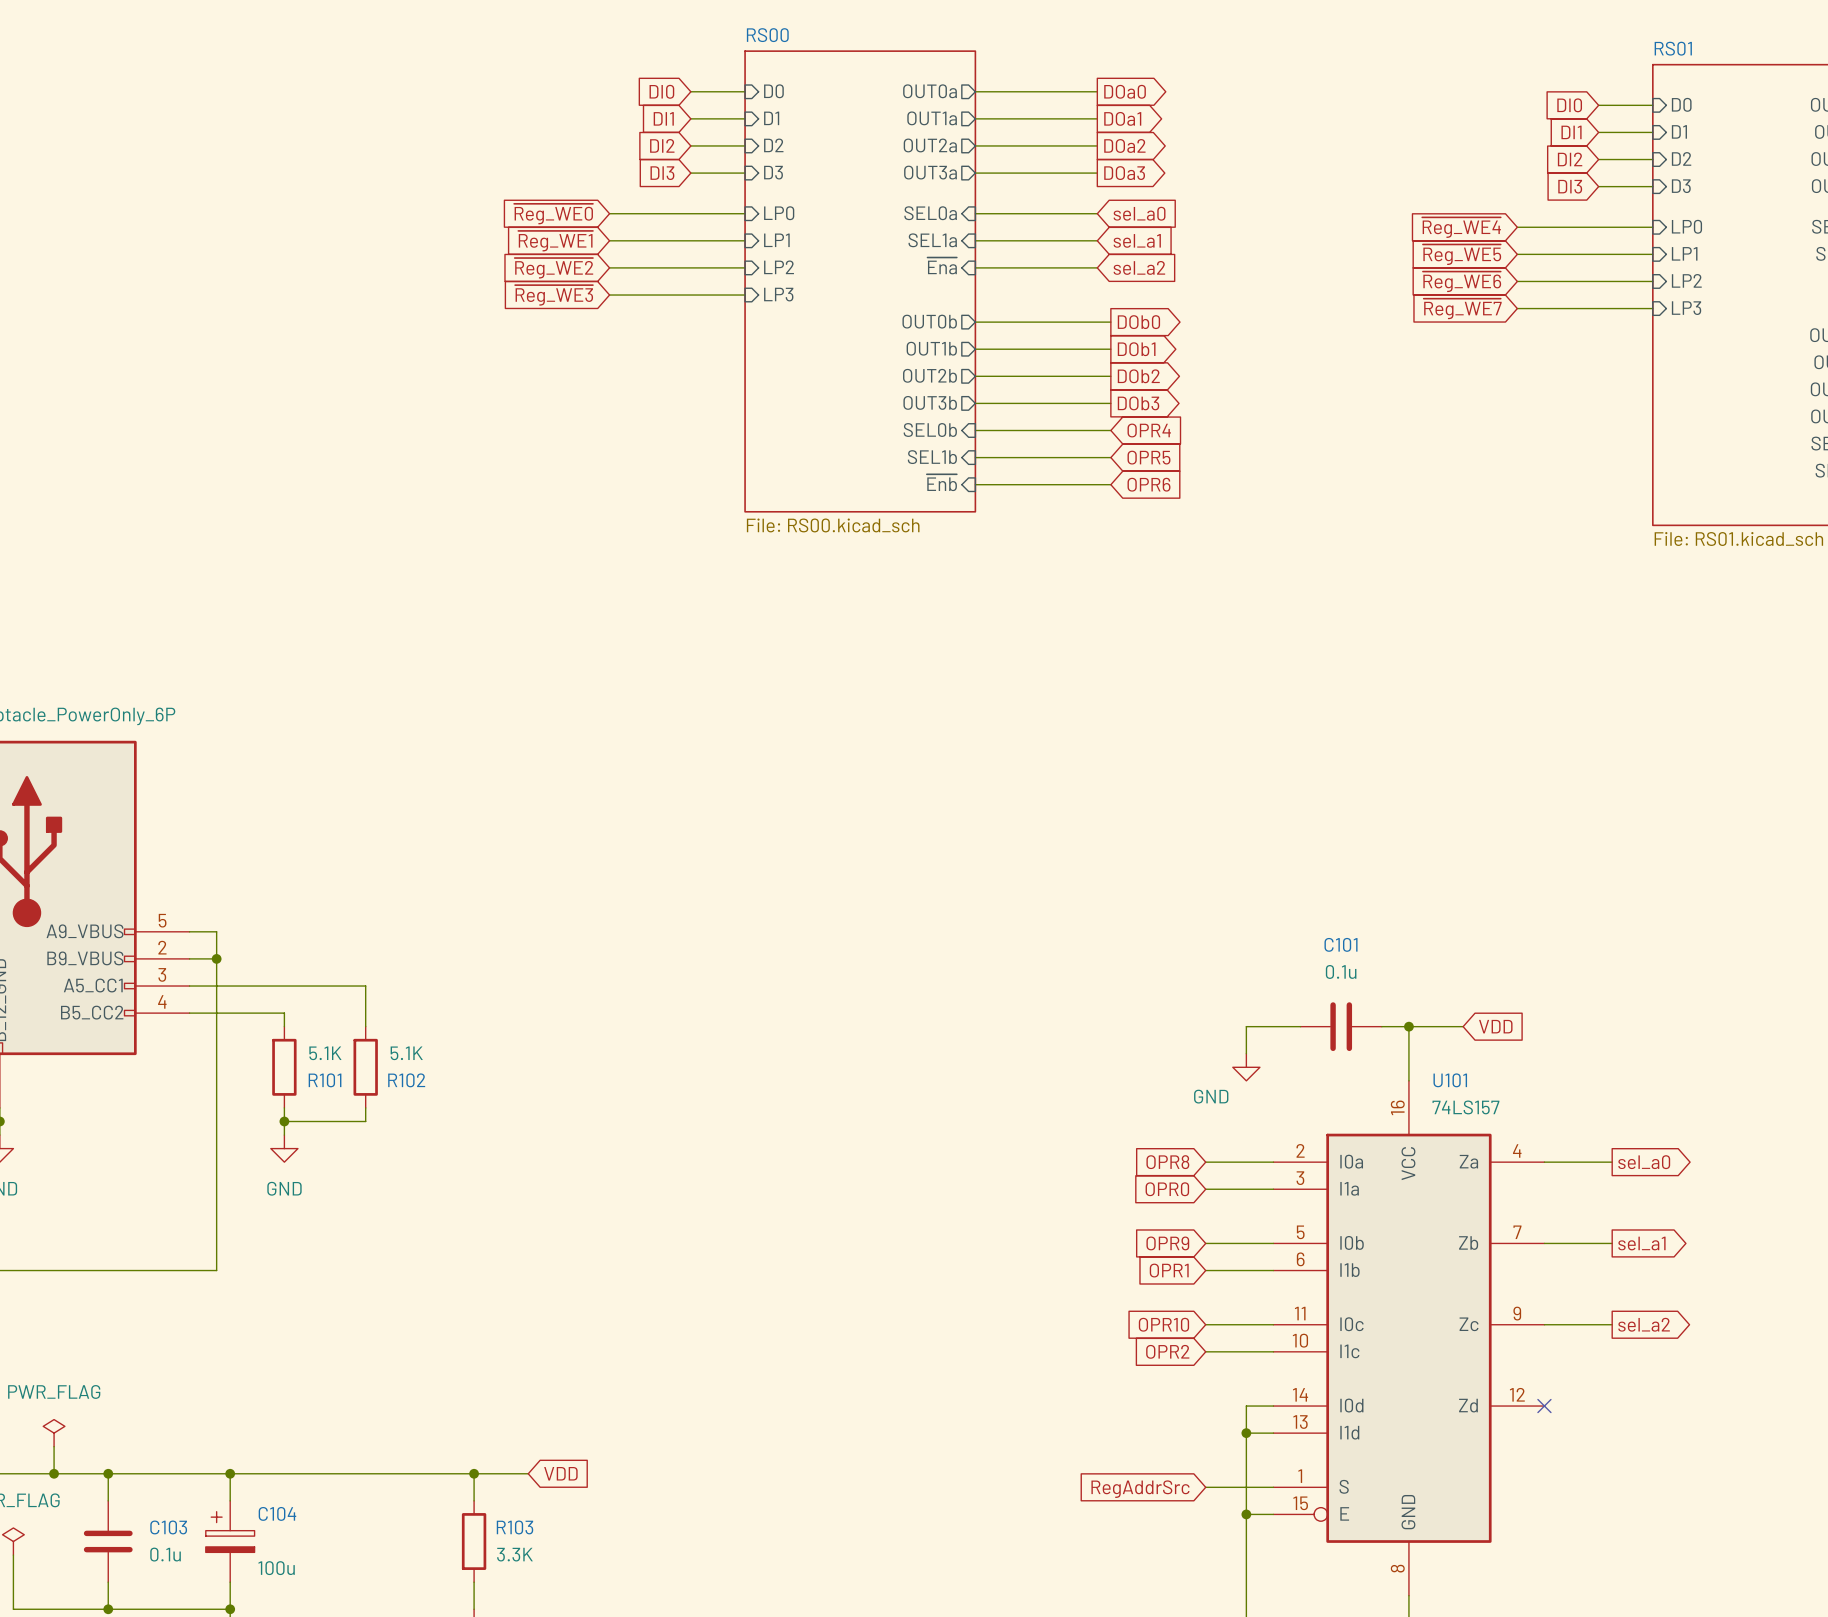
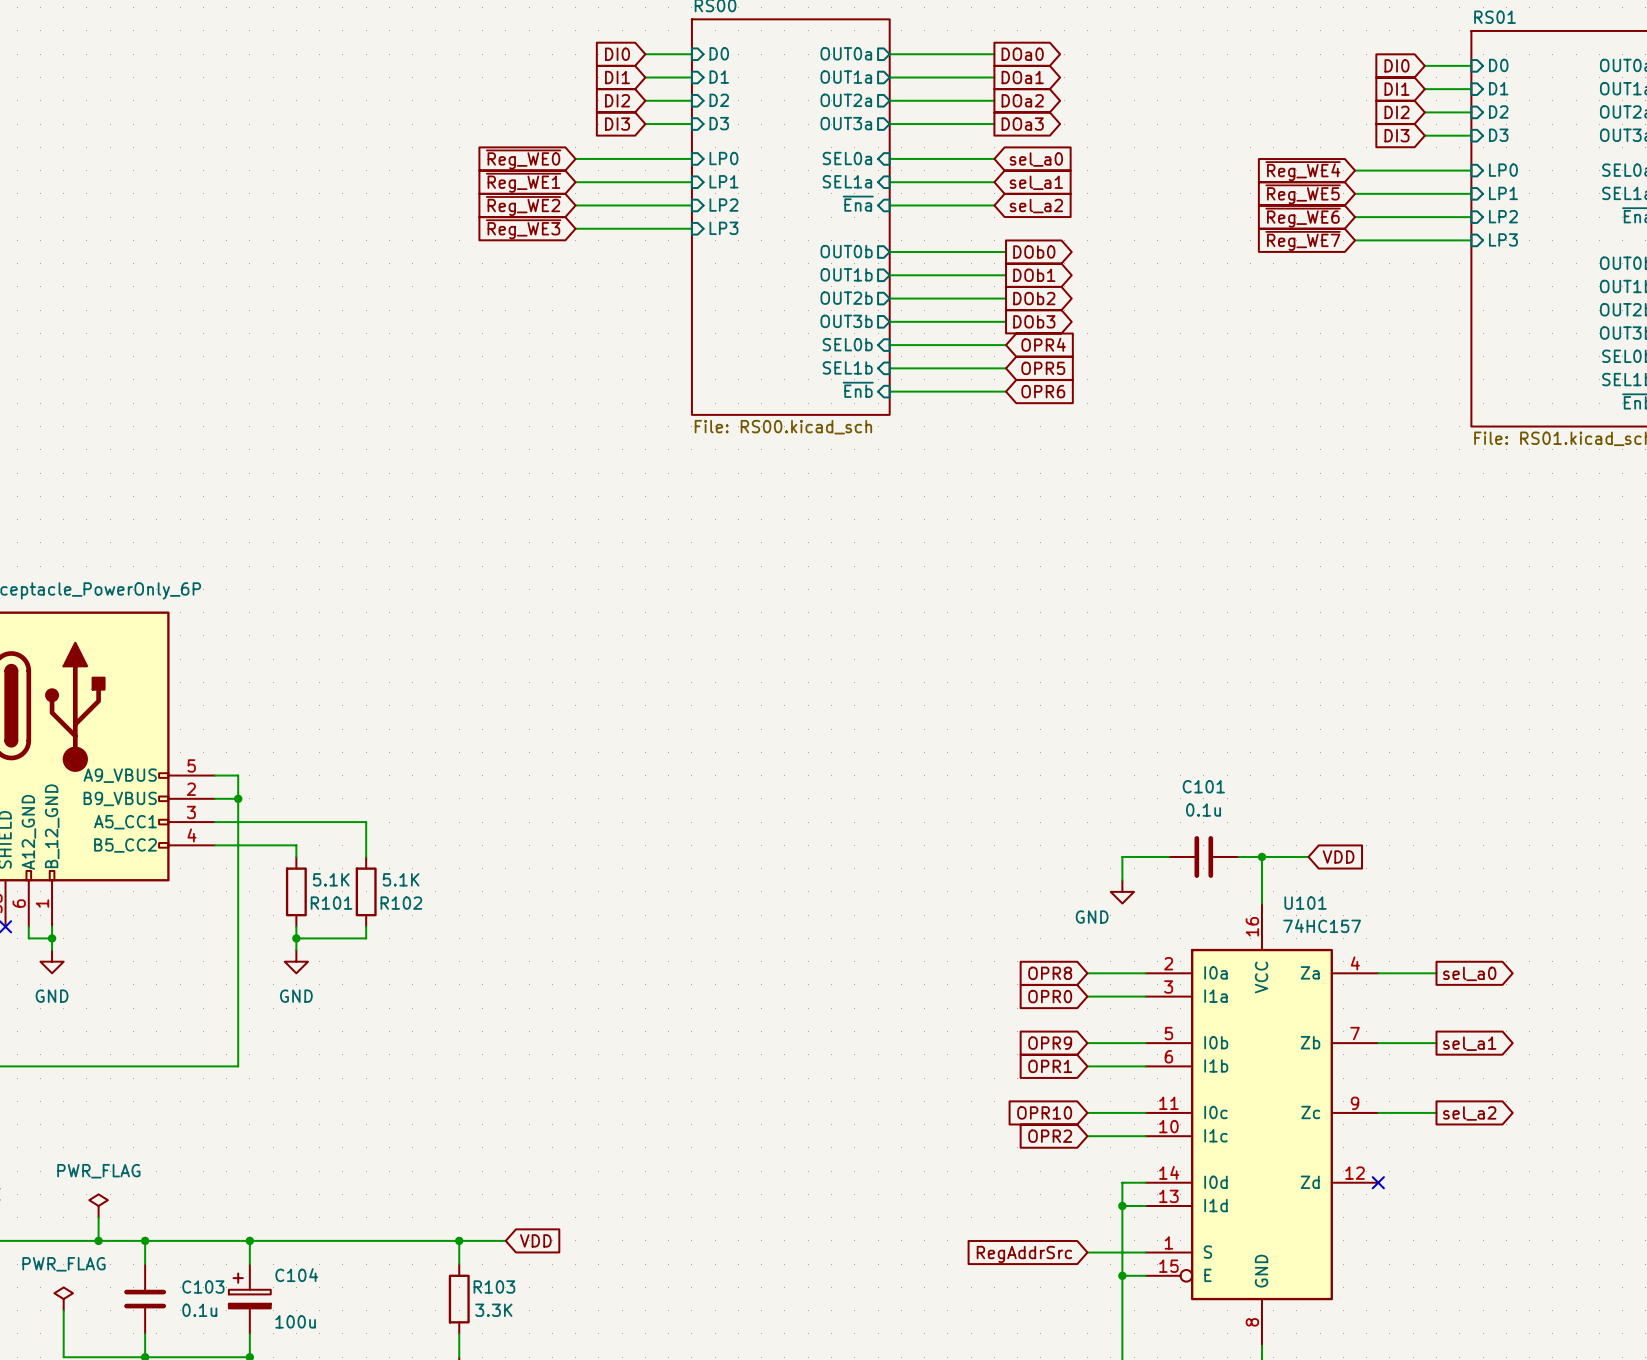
U101 value: 74LS157 (1465, 1107) -> 74HC157 (1322, 926)

